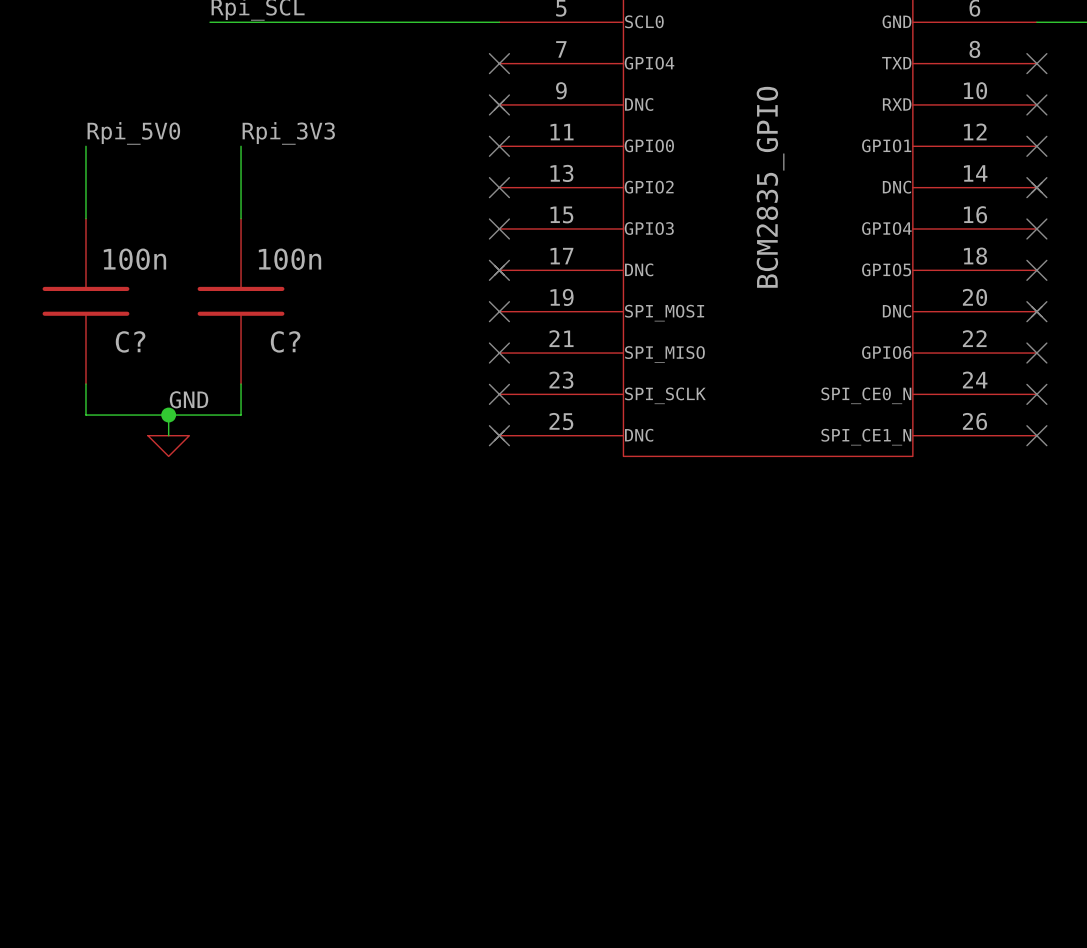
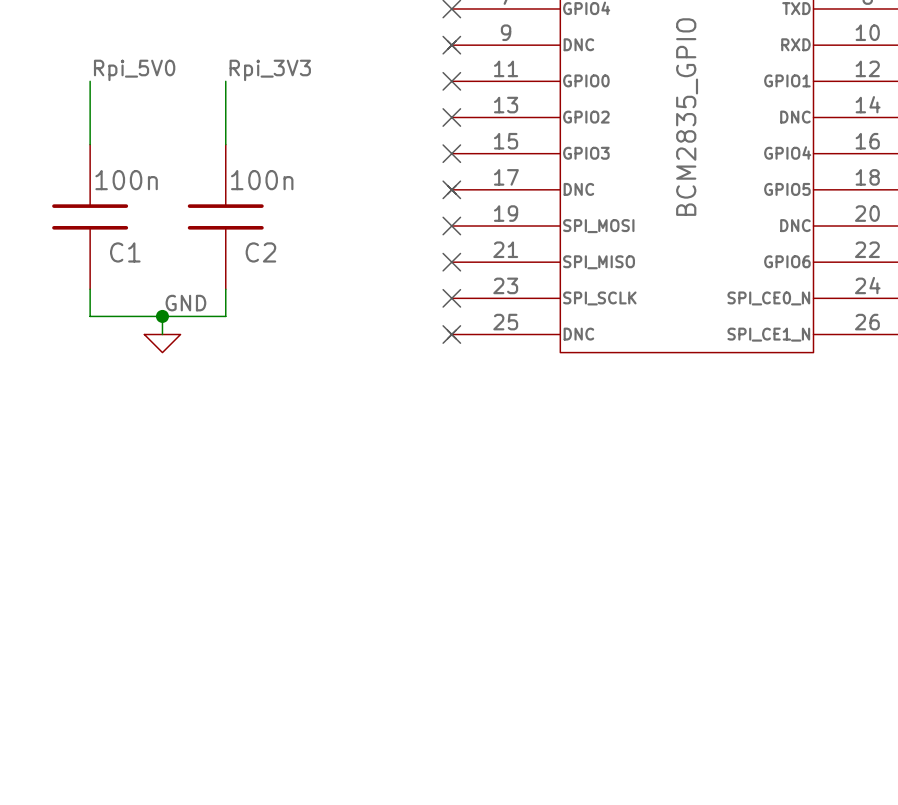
C? name: C? (130, 341) -> C1 (125, 252)
C? name: C? (285, 341) -> C2 (260, 252)

